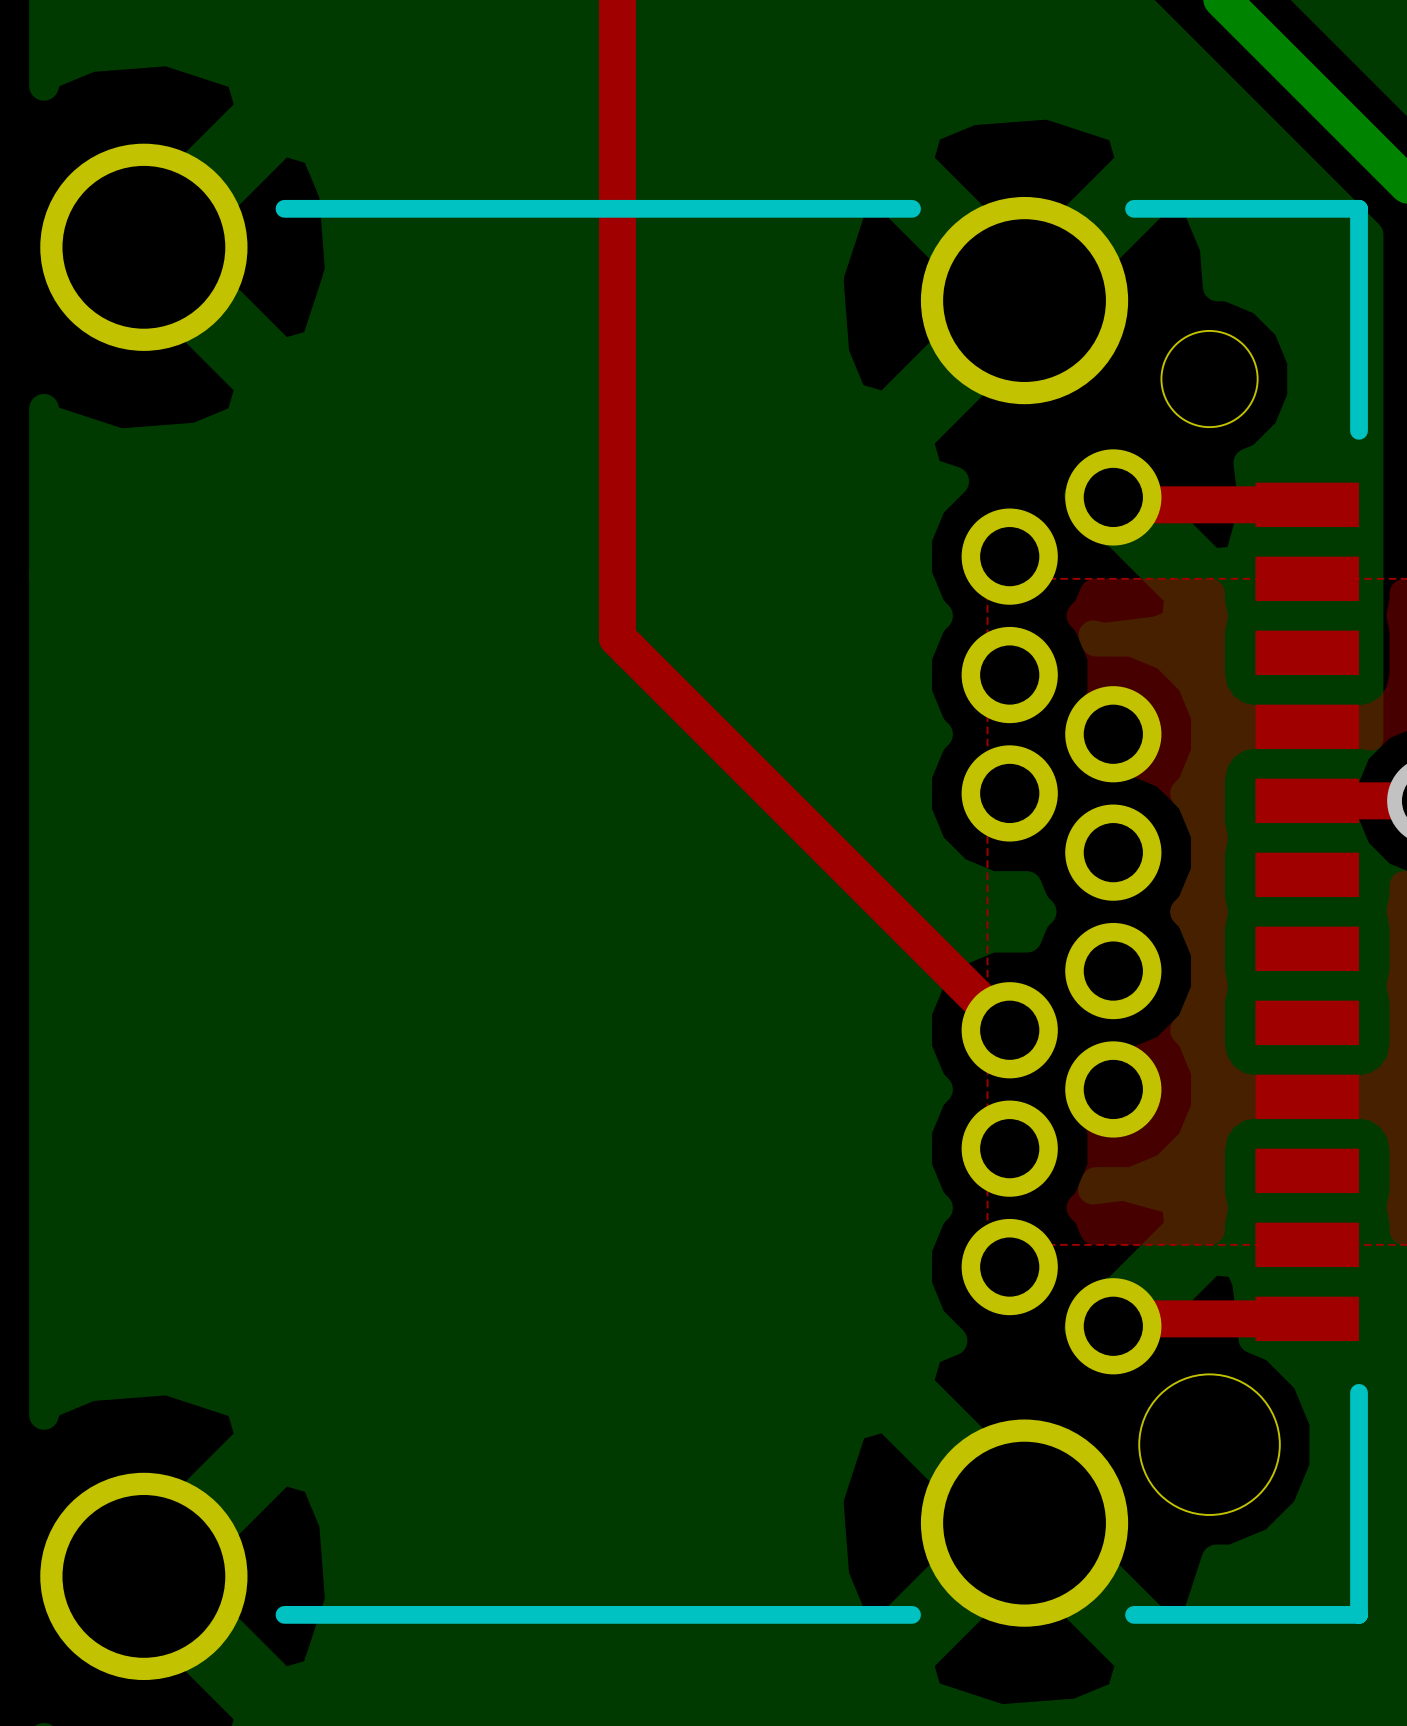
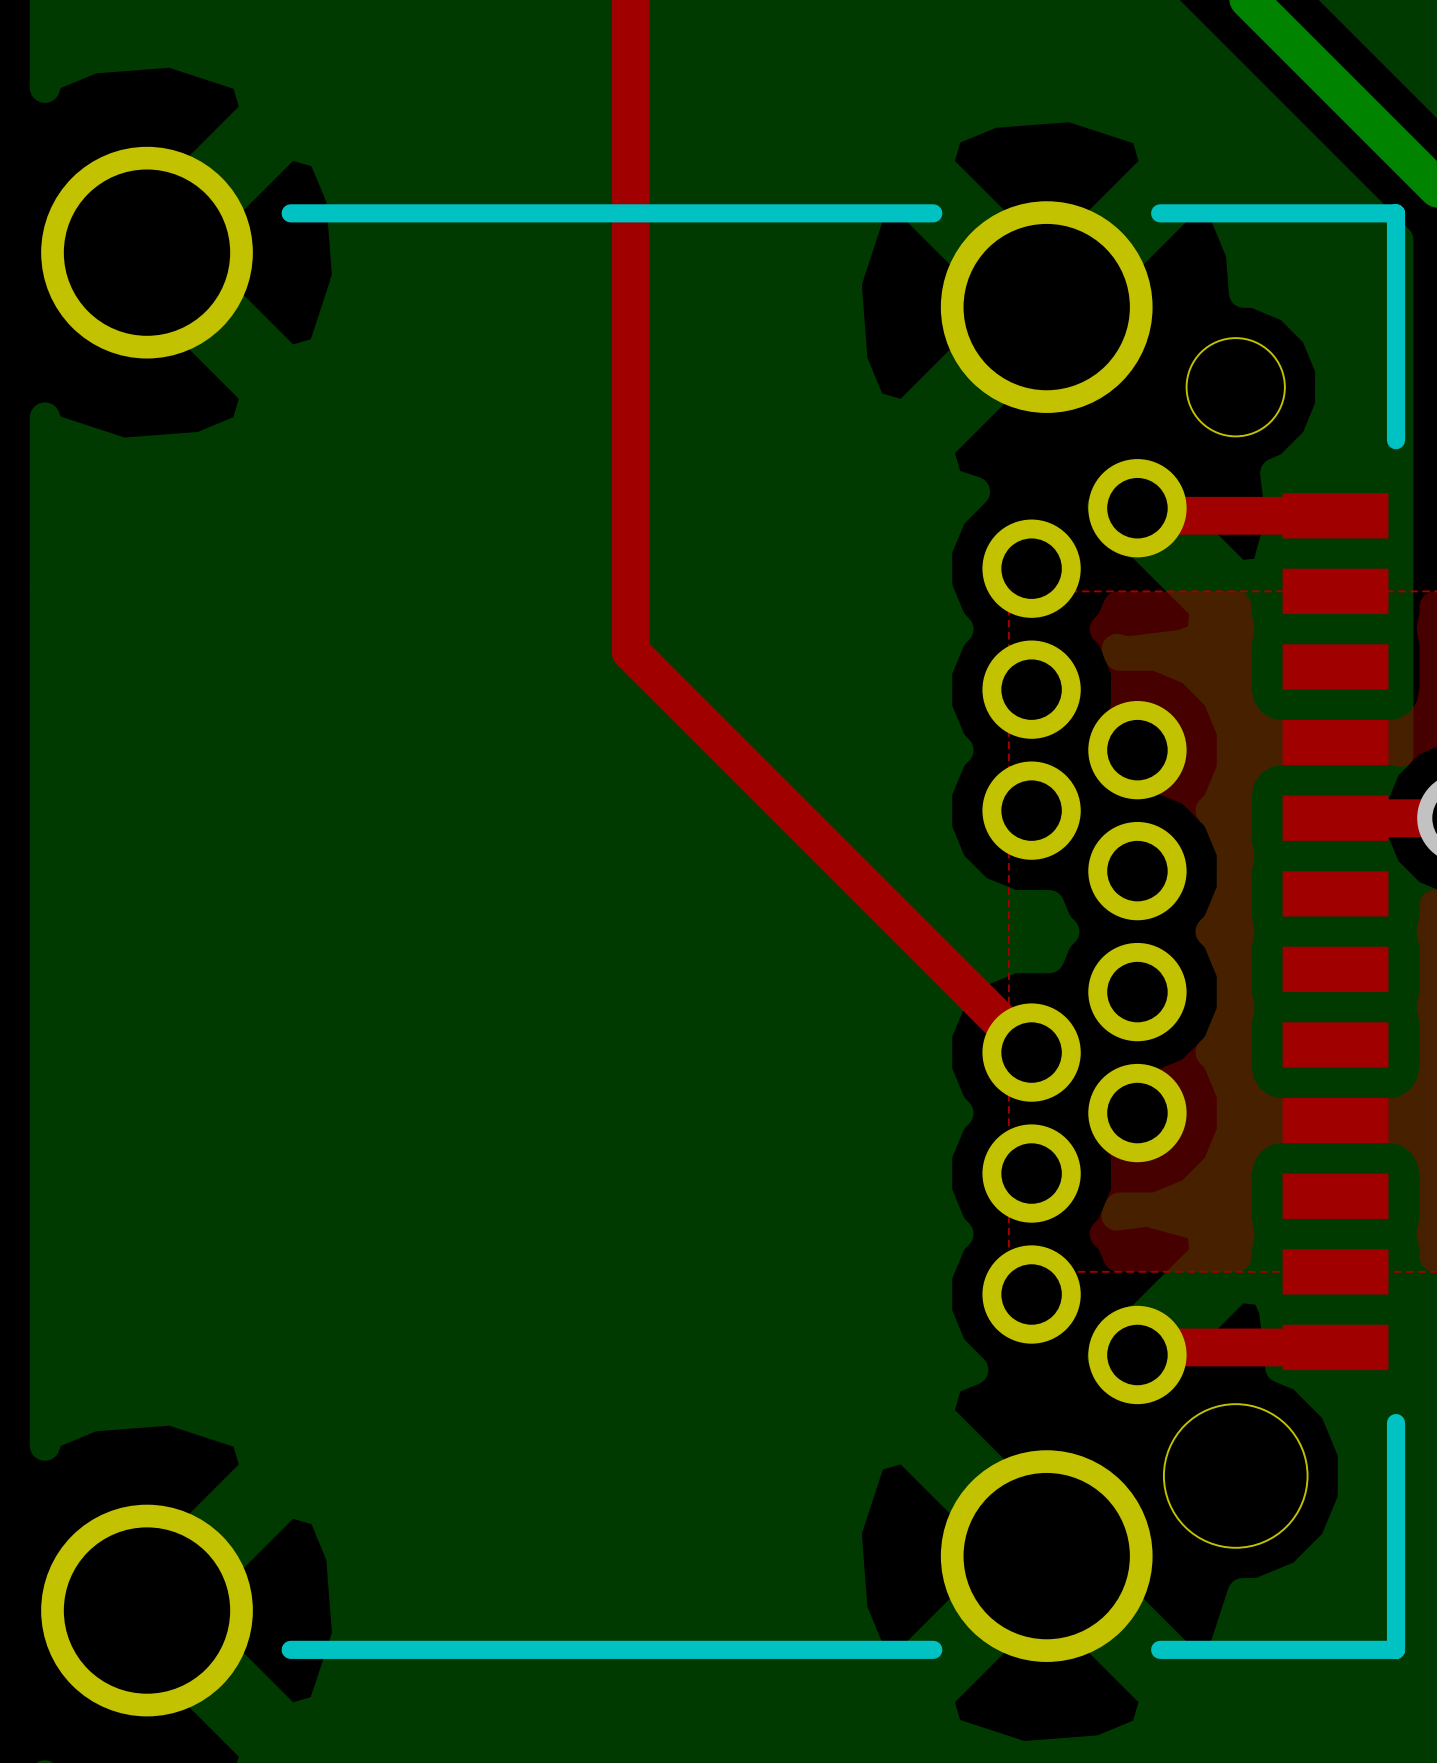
part footprint: [40, 143, 1368, 1681] -> [41, 146, 1406, 1717]

